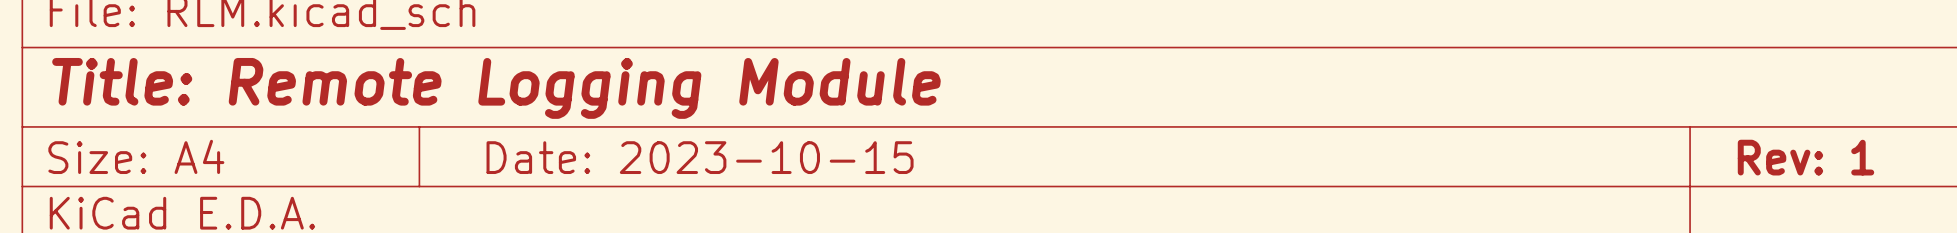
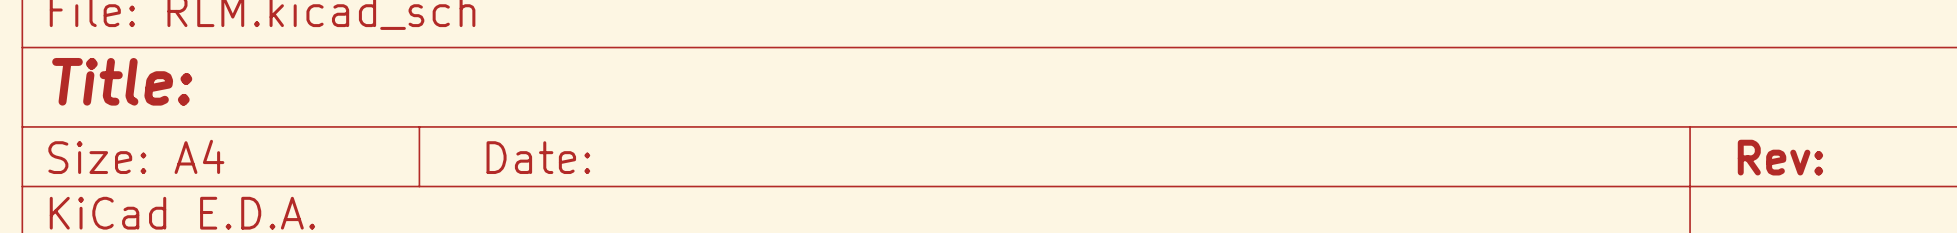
title block: Title: Remote Logging Module (496, 88) -> Title: (122, 81)
title block: Date: 2023-10-15 (700, 157) -> Date: (538, 157)
title block: Rev: 1 (1805, 157) -> Rev: (1780, 157)

